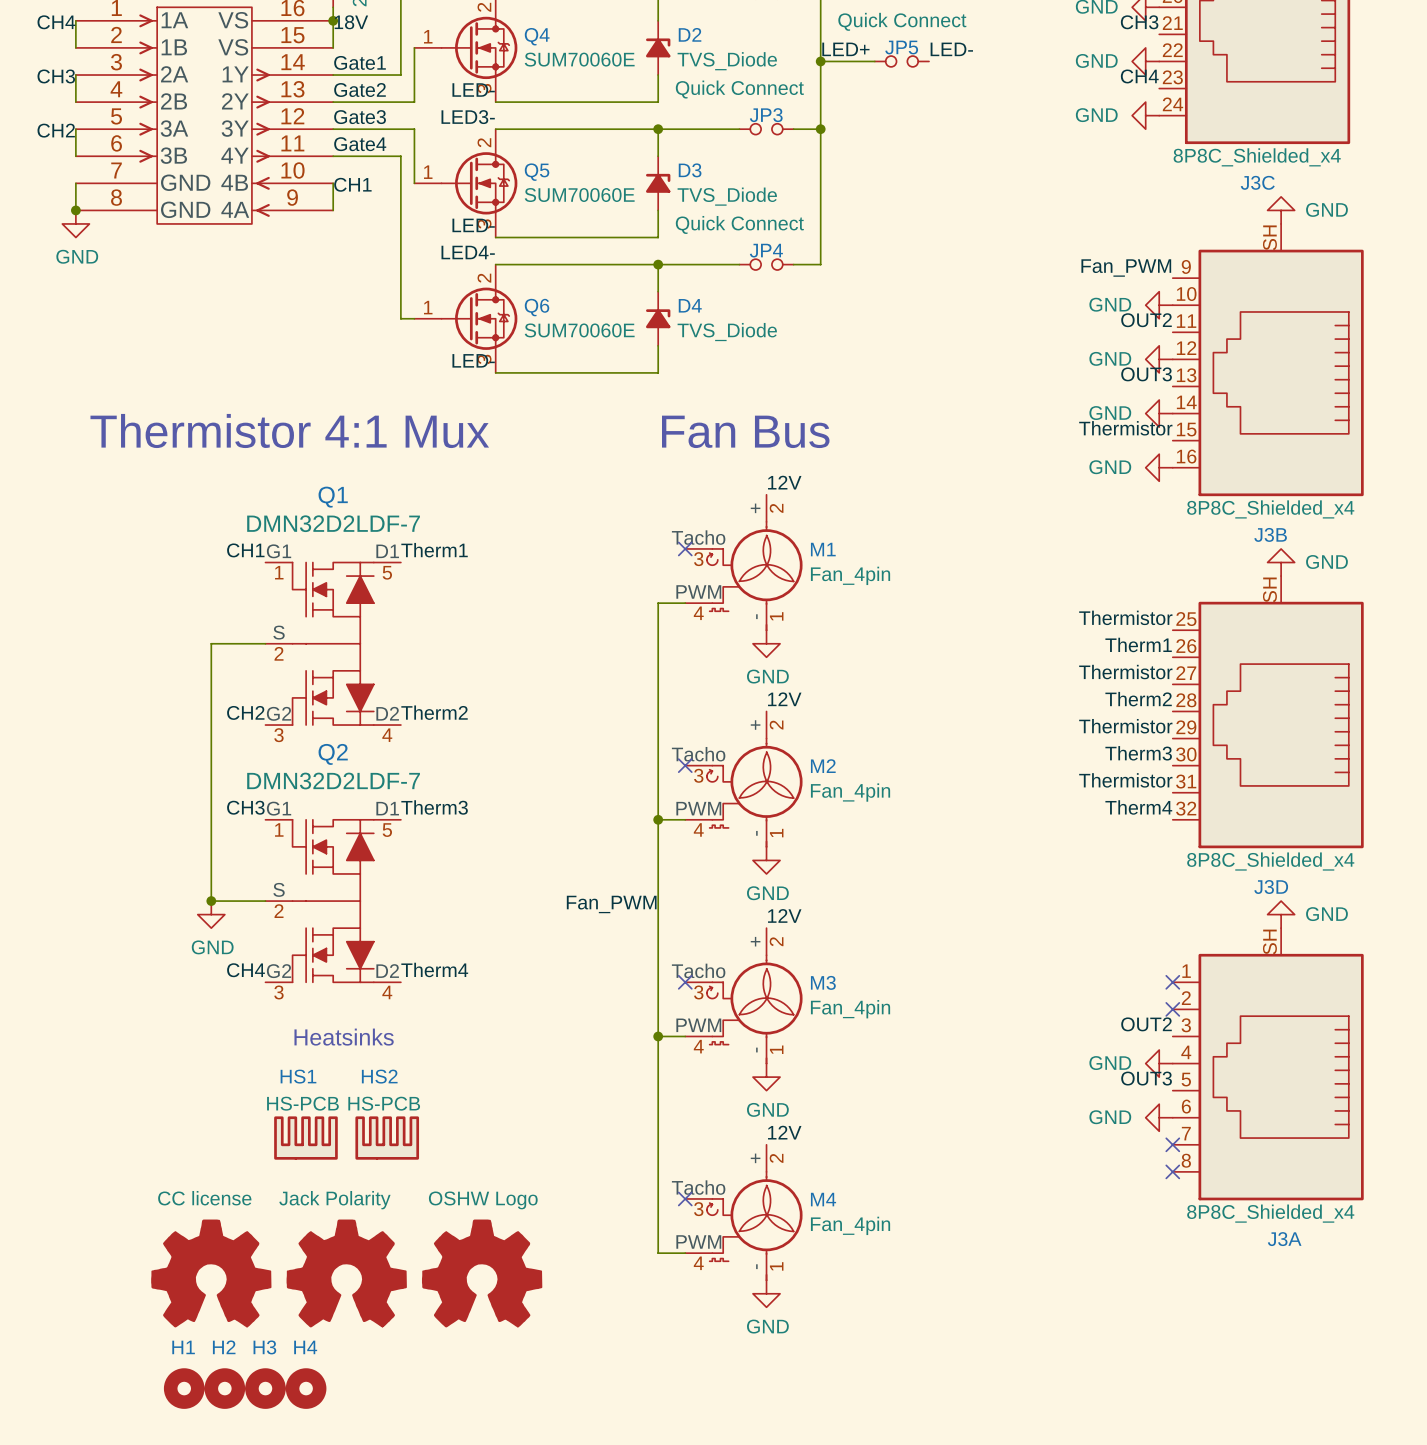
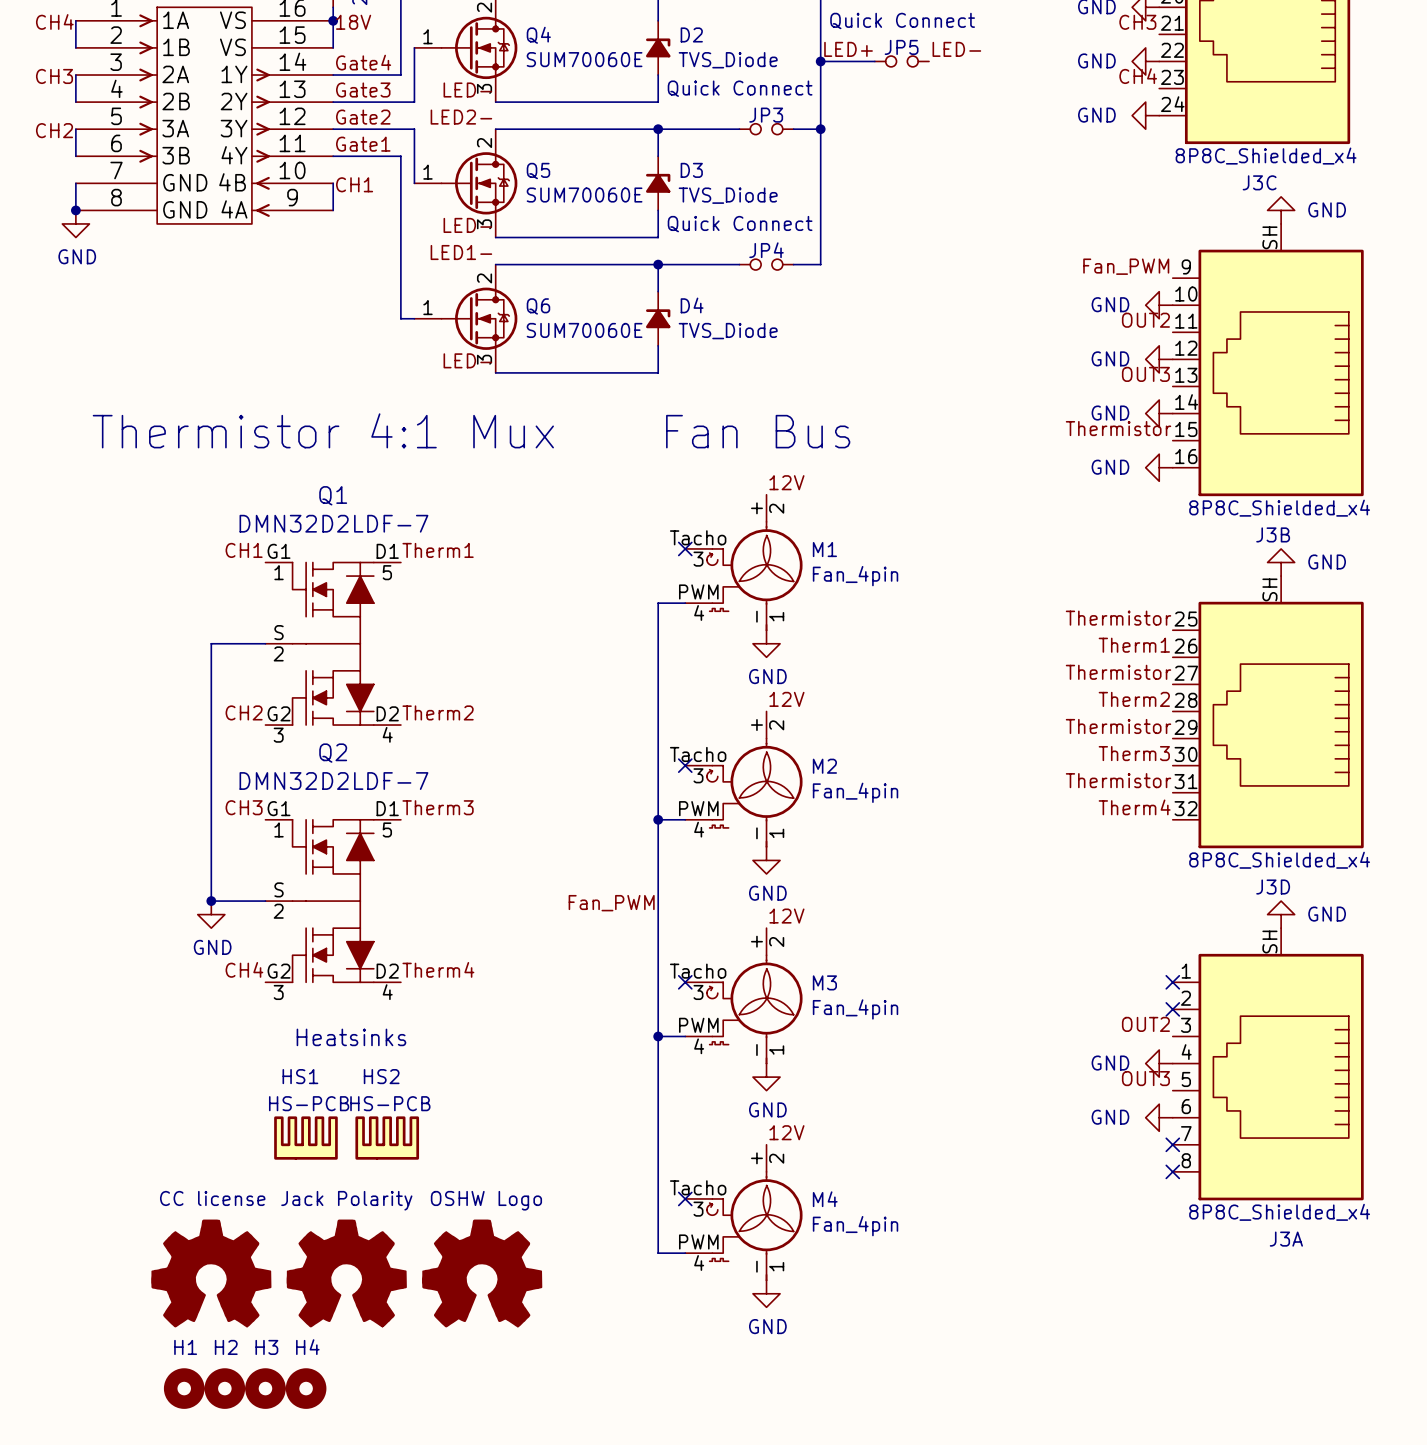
label: Gate1 (360, 62) -> Gate4 (363, 62)
label: Gate2 (359, 90) -> Gate3 (363, 90)
label: Gate3 (360, 117) -> Gate2 (363, 117)
label: LED3- (468, 117) -> LED2- (461, 117)
label: Gate4 (360, 144) -> Gate1 (363, 144)
label: LED4- (468, 252) -> LED1- (461, 252)

